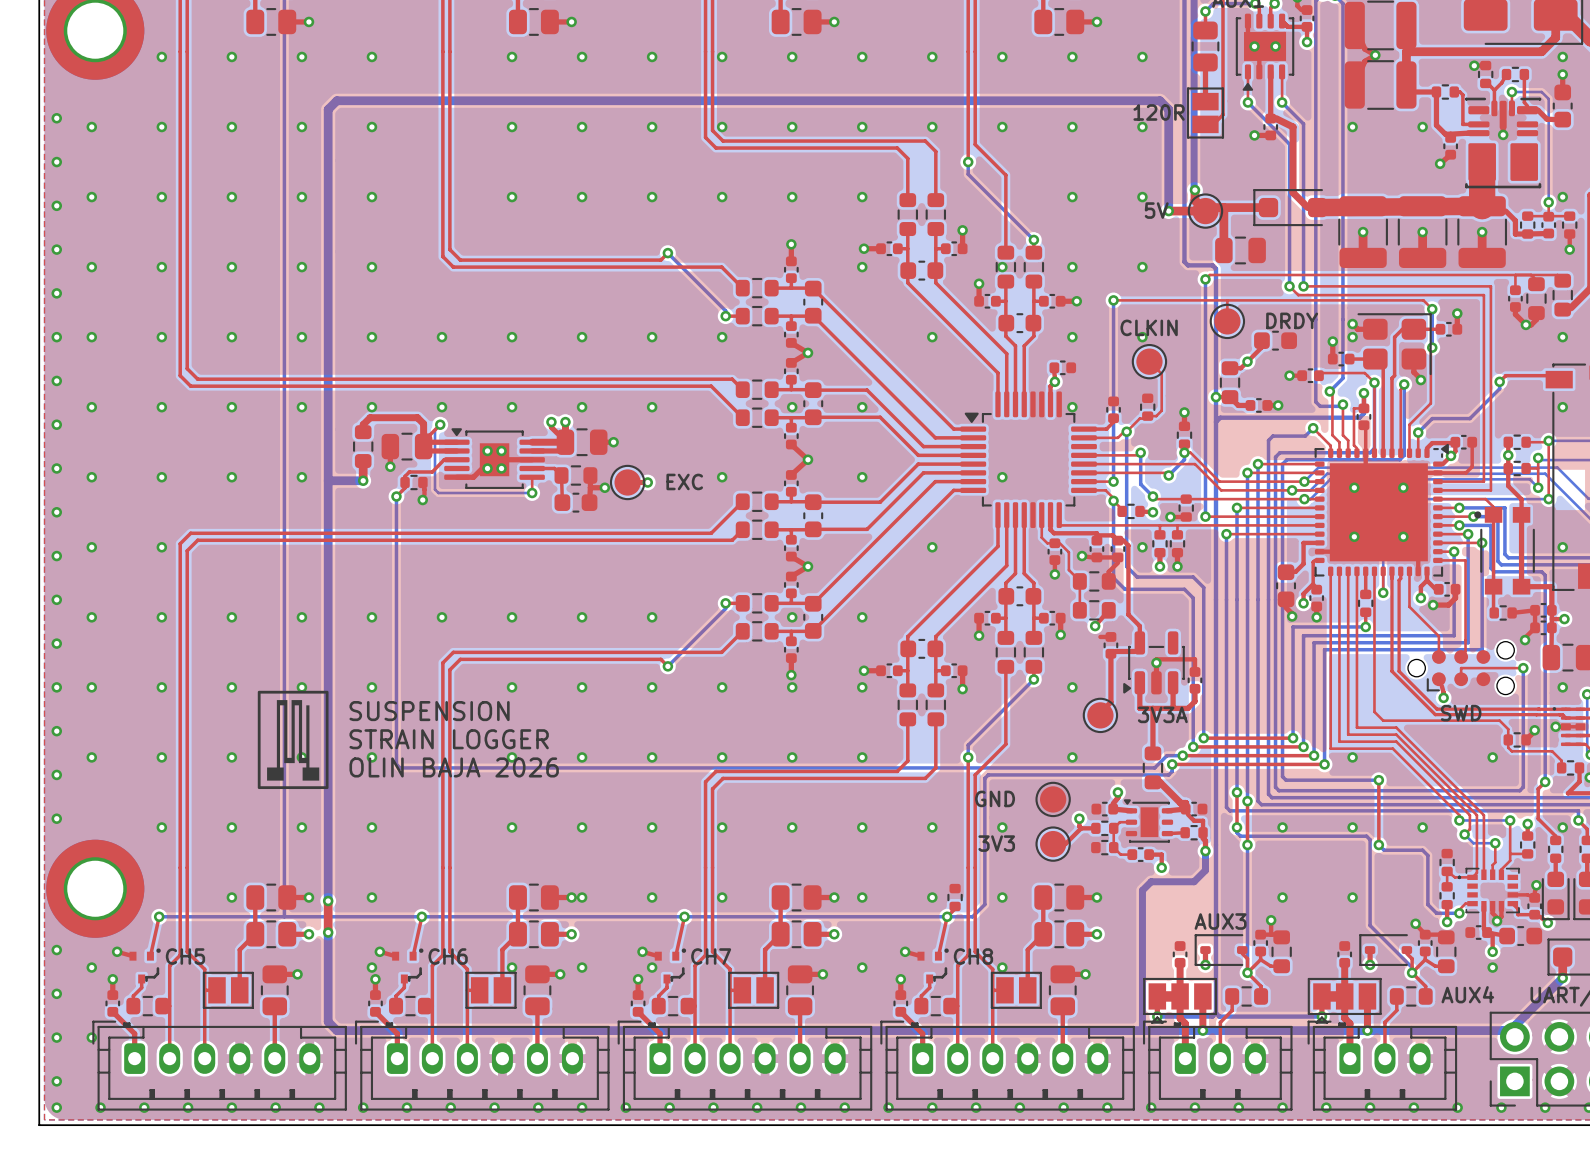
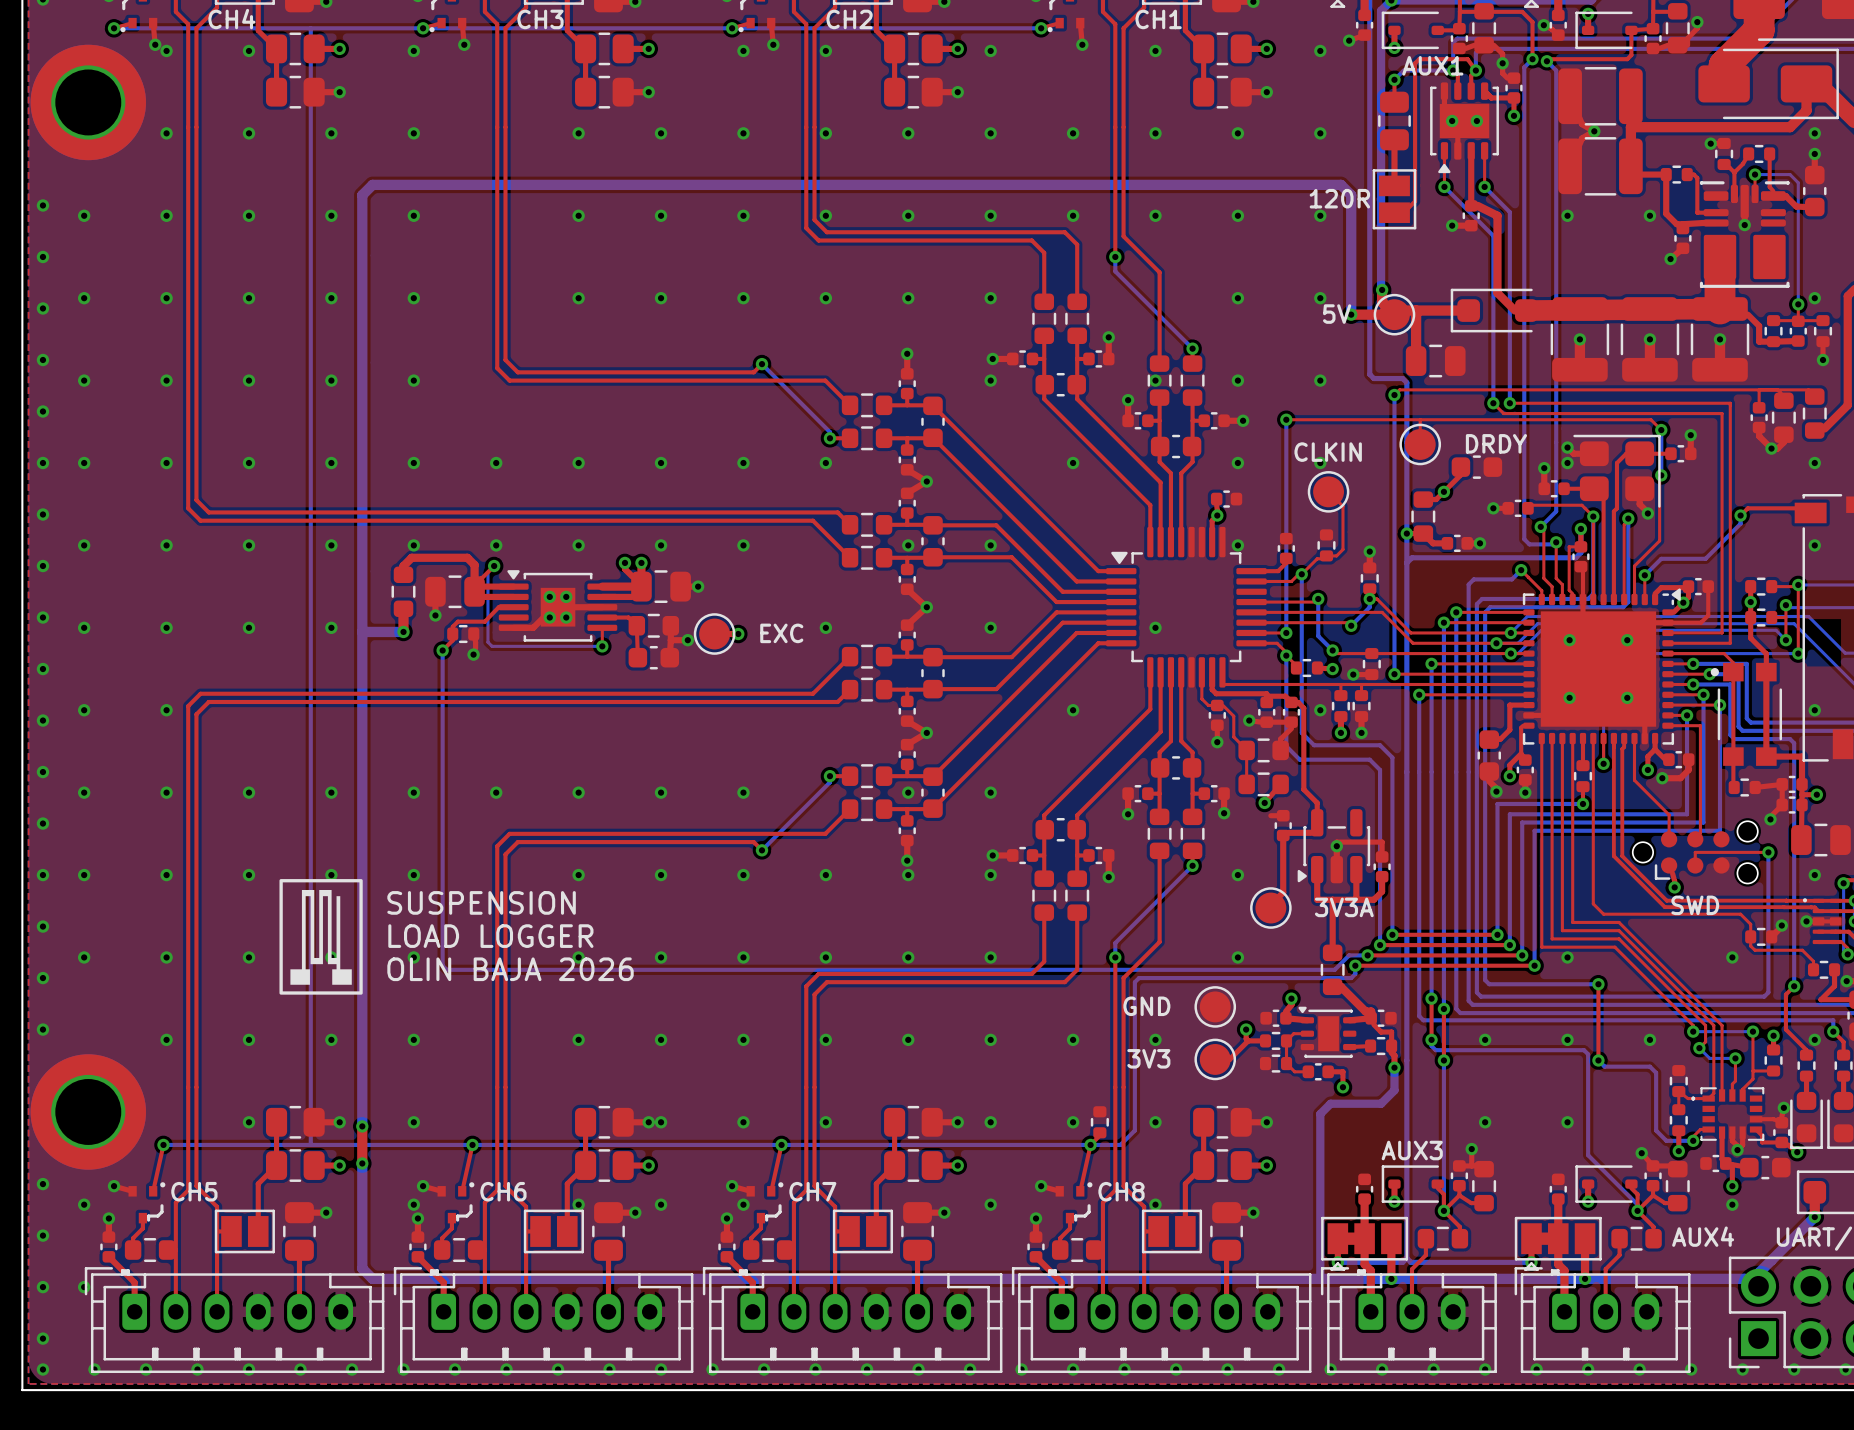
text: STRAIN LOGGER (449, 739) -> LOAD LOGGER (490, 936)

